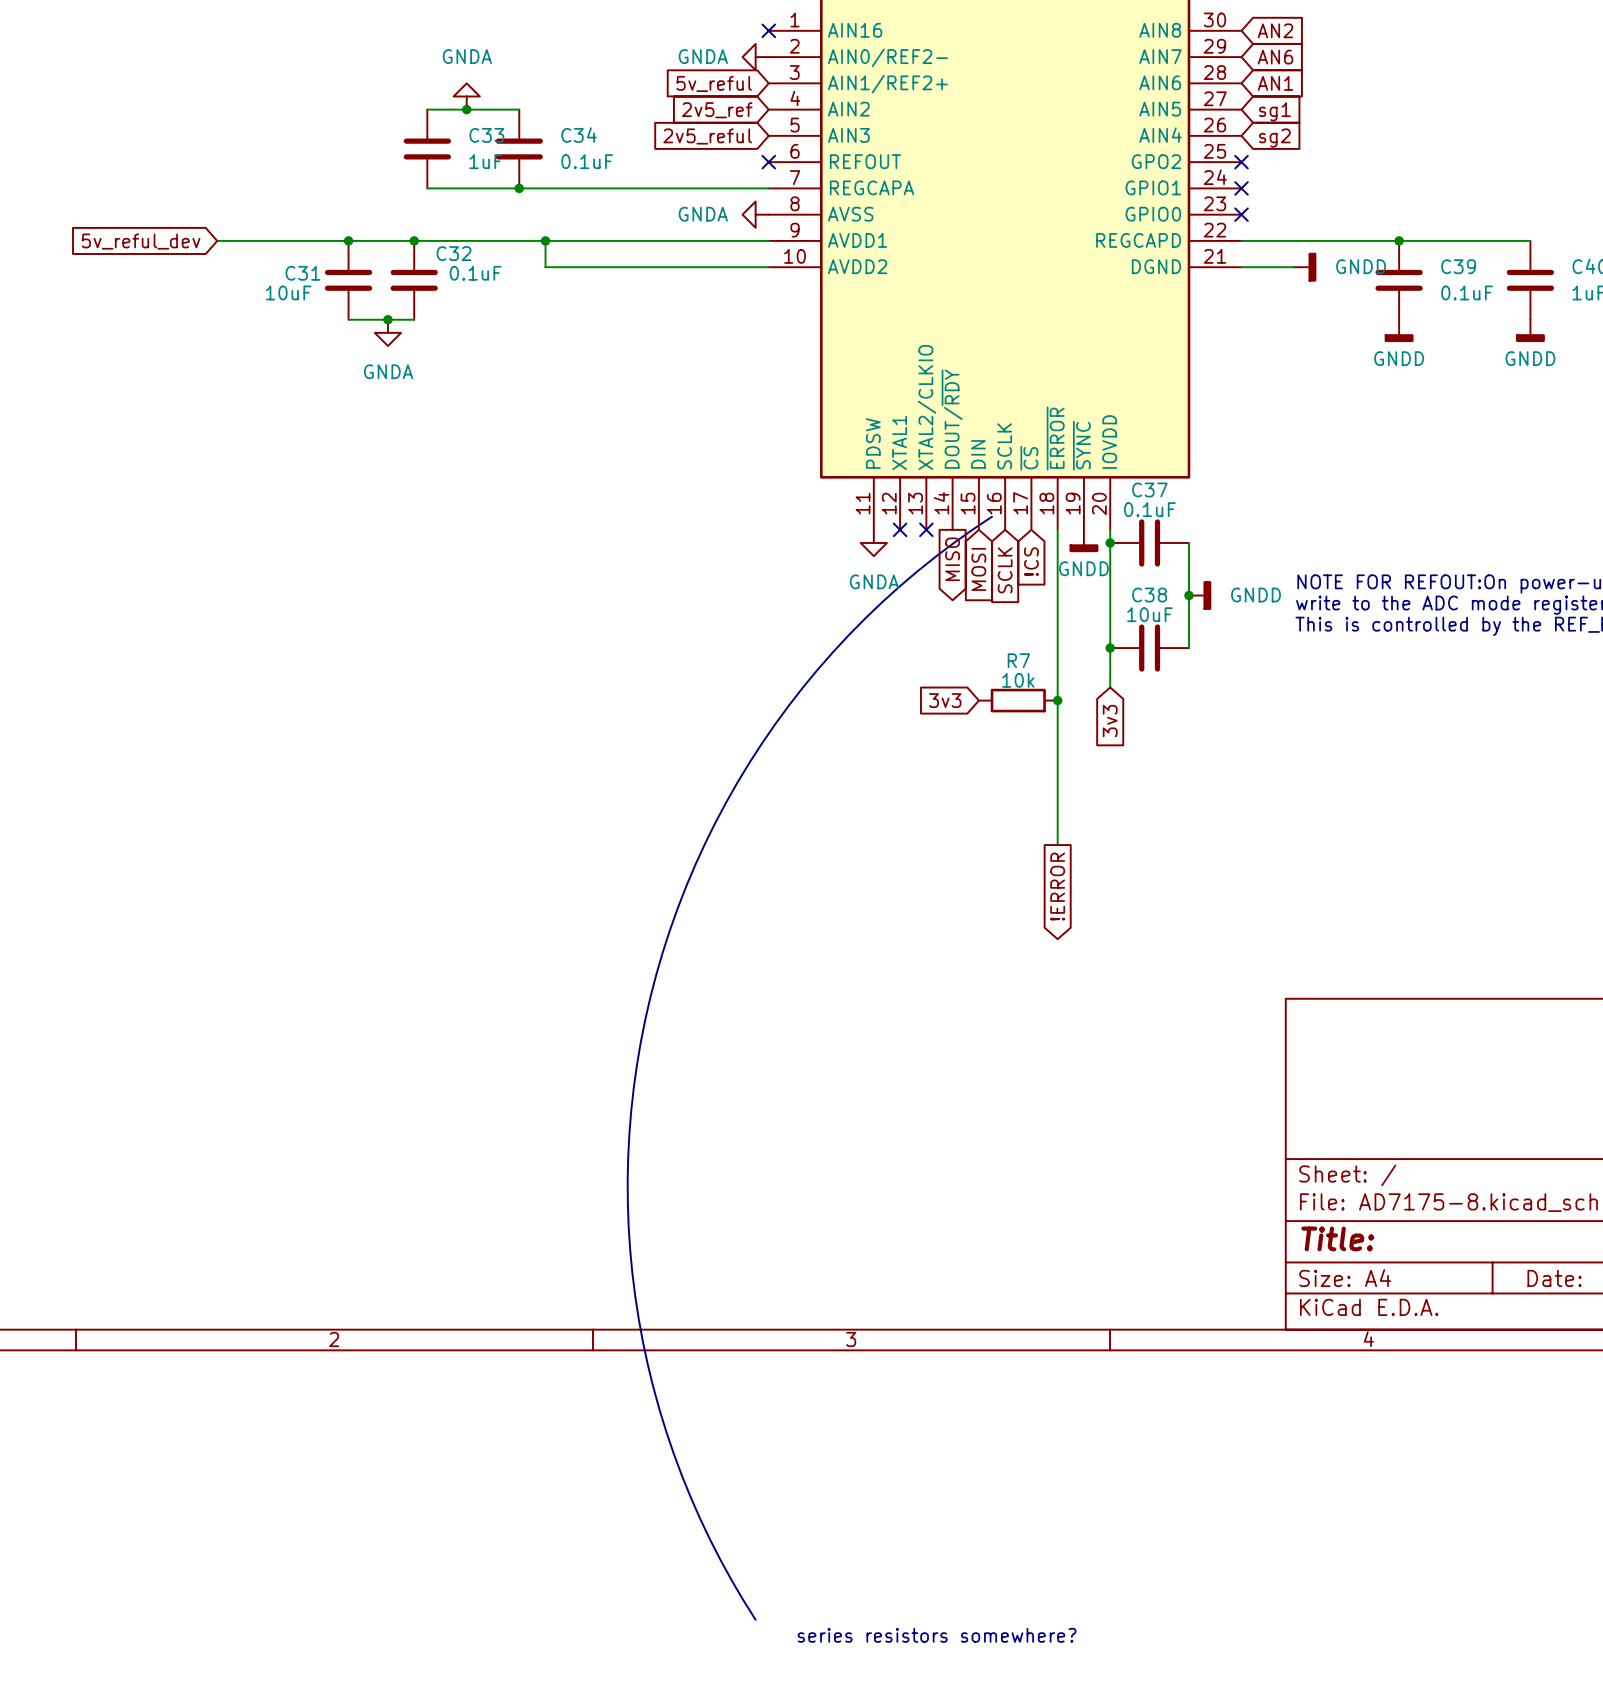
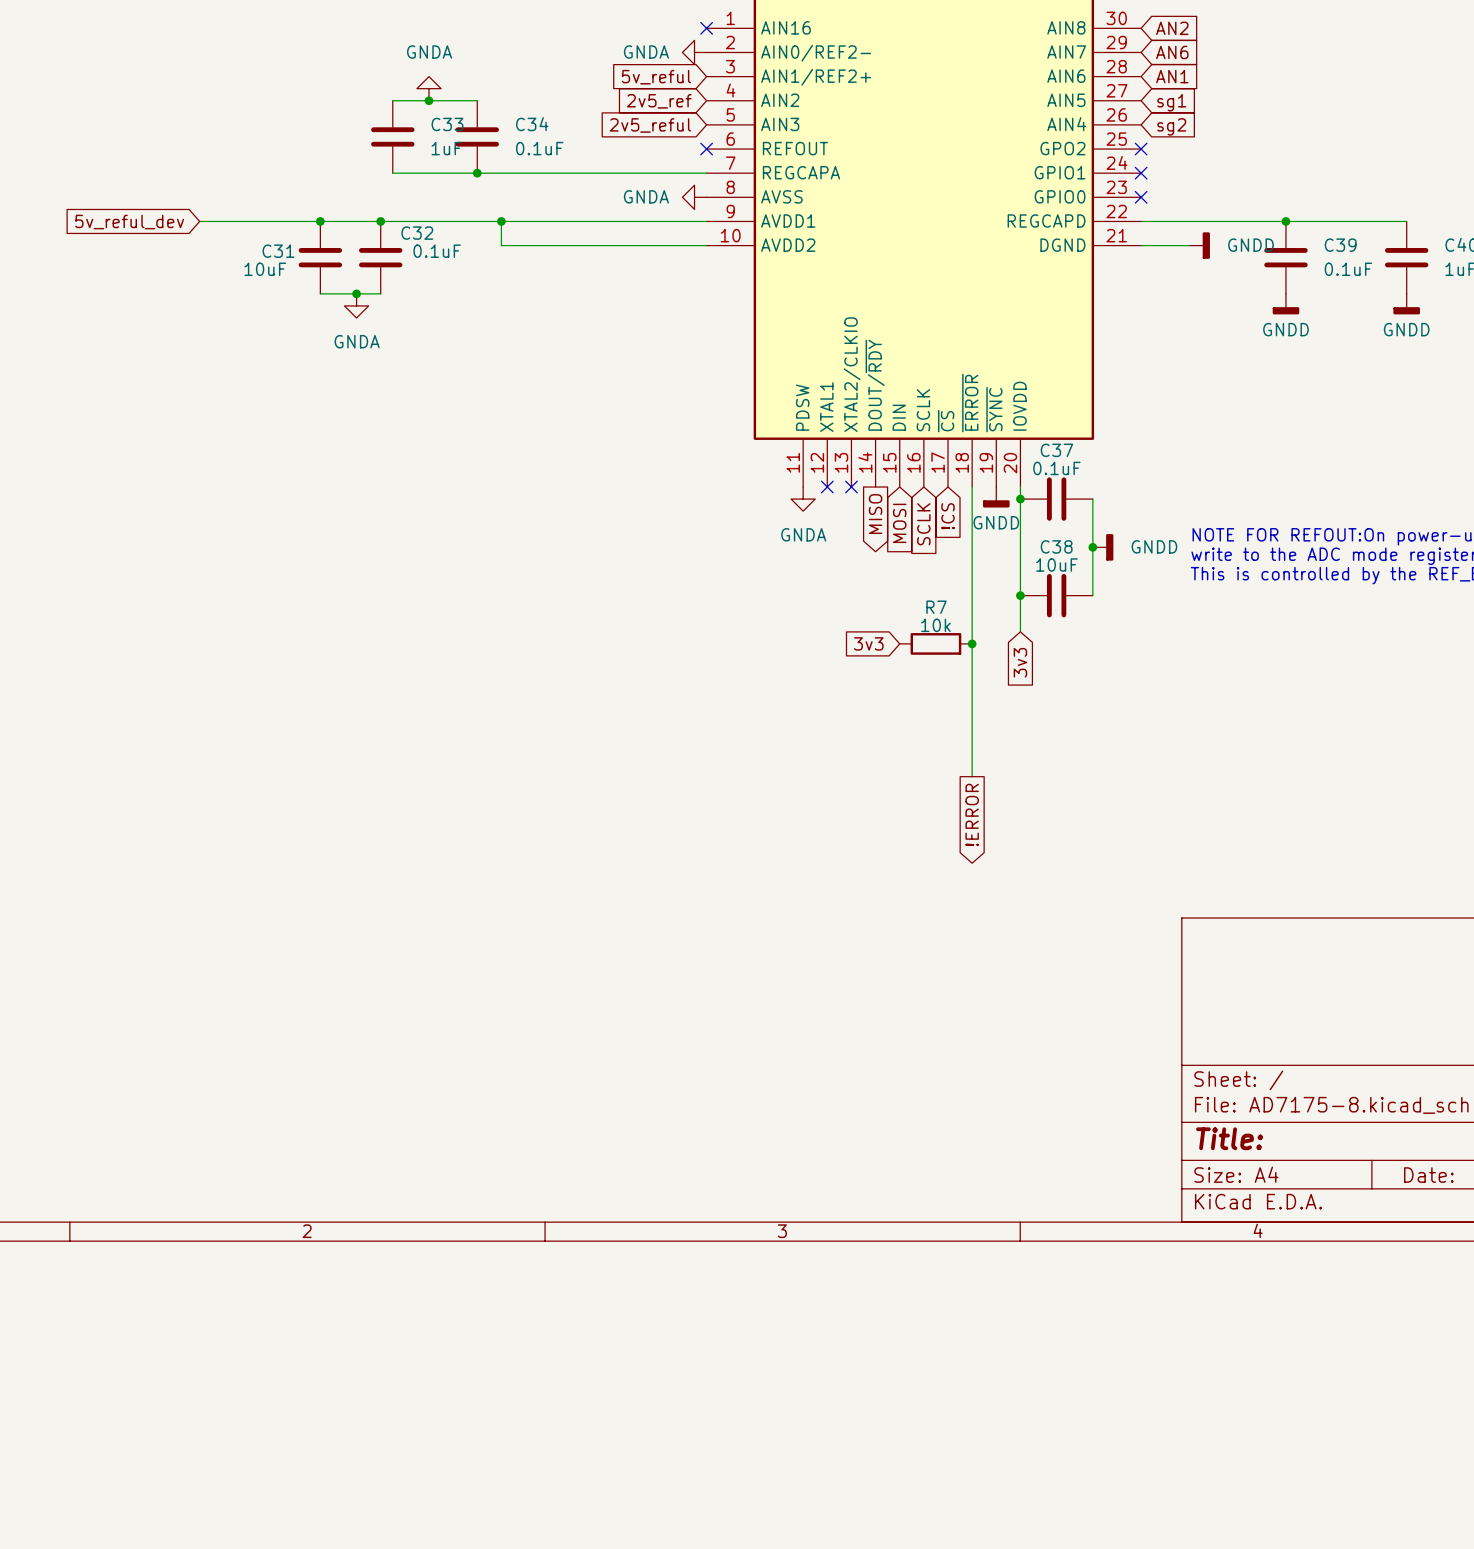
line: (992, 516) (935, 557) (882, 602) (833, 651) (775, 724) (726, 802) (695, 865) (670, 929) (645, 1019) (631, 1110) (627, 1180) (630, 1250) (638, 1319) (659, 1409) (681, 1475) (720, 1559) (755, 1619) -> none
text: series resistors somewhere? (937, 1635) -> none

